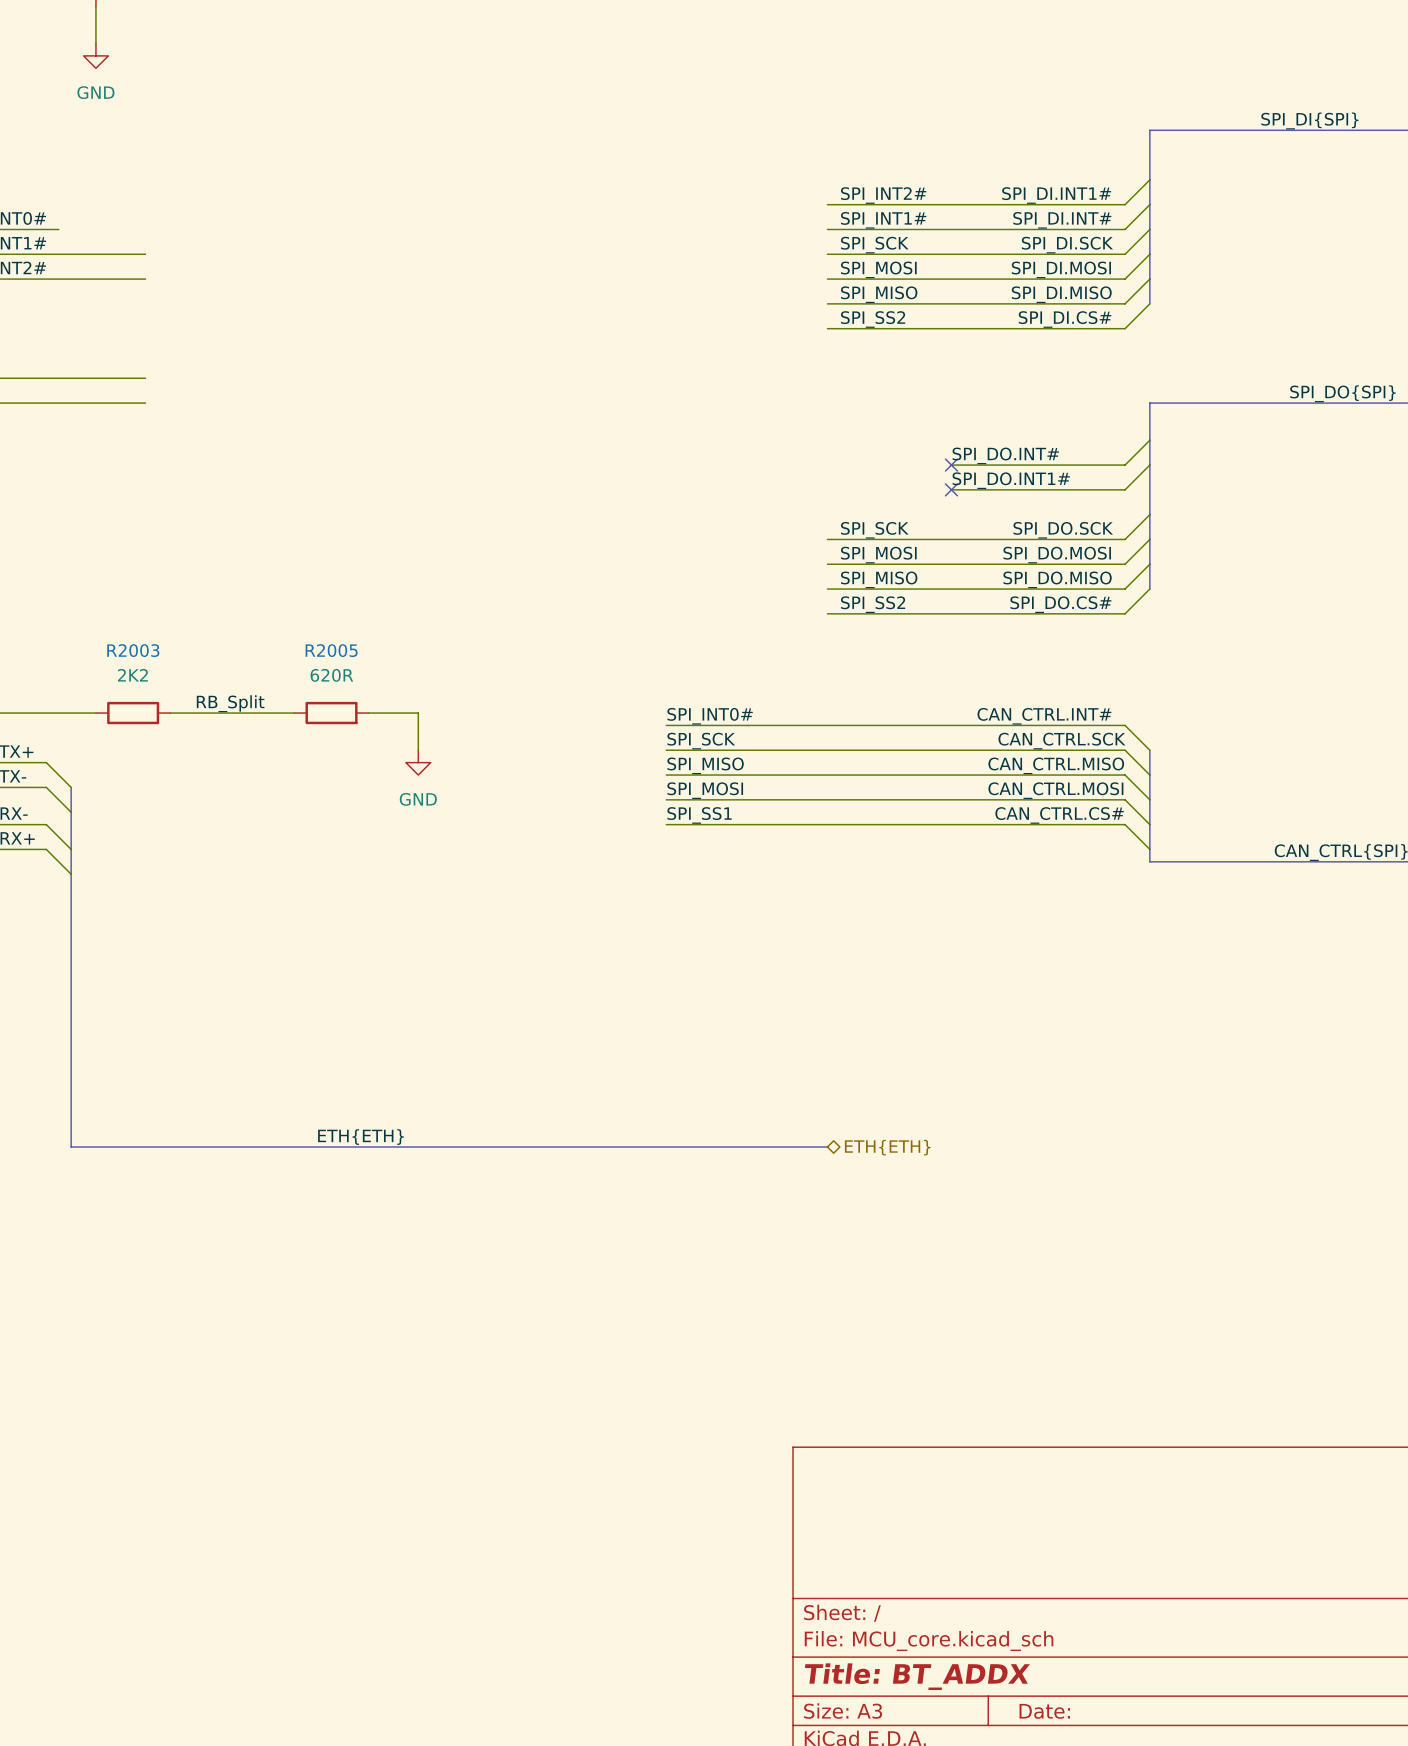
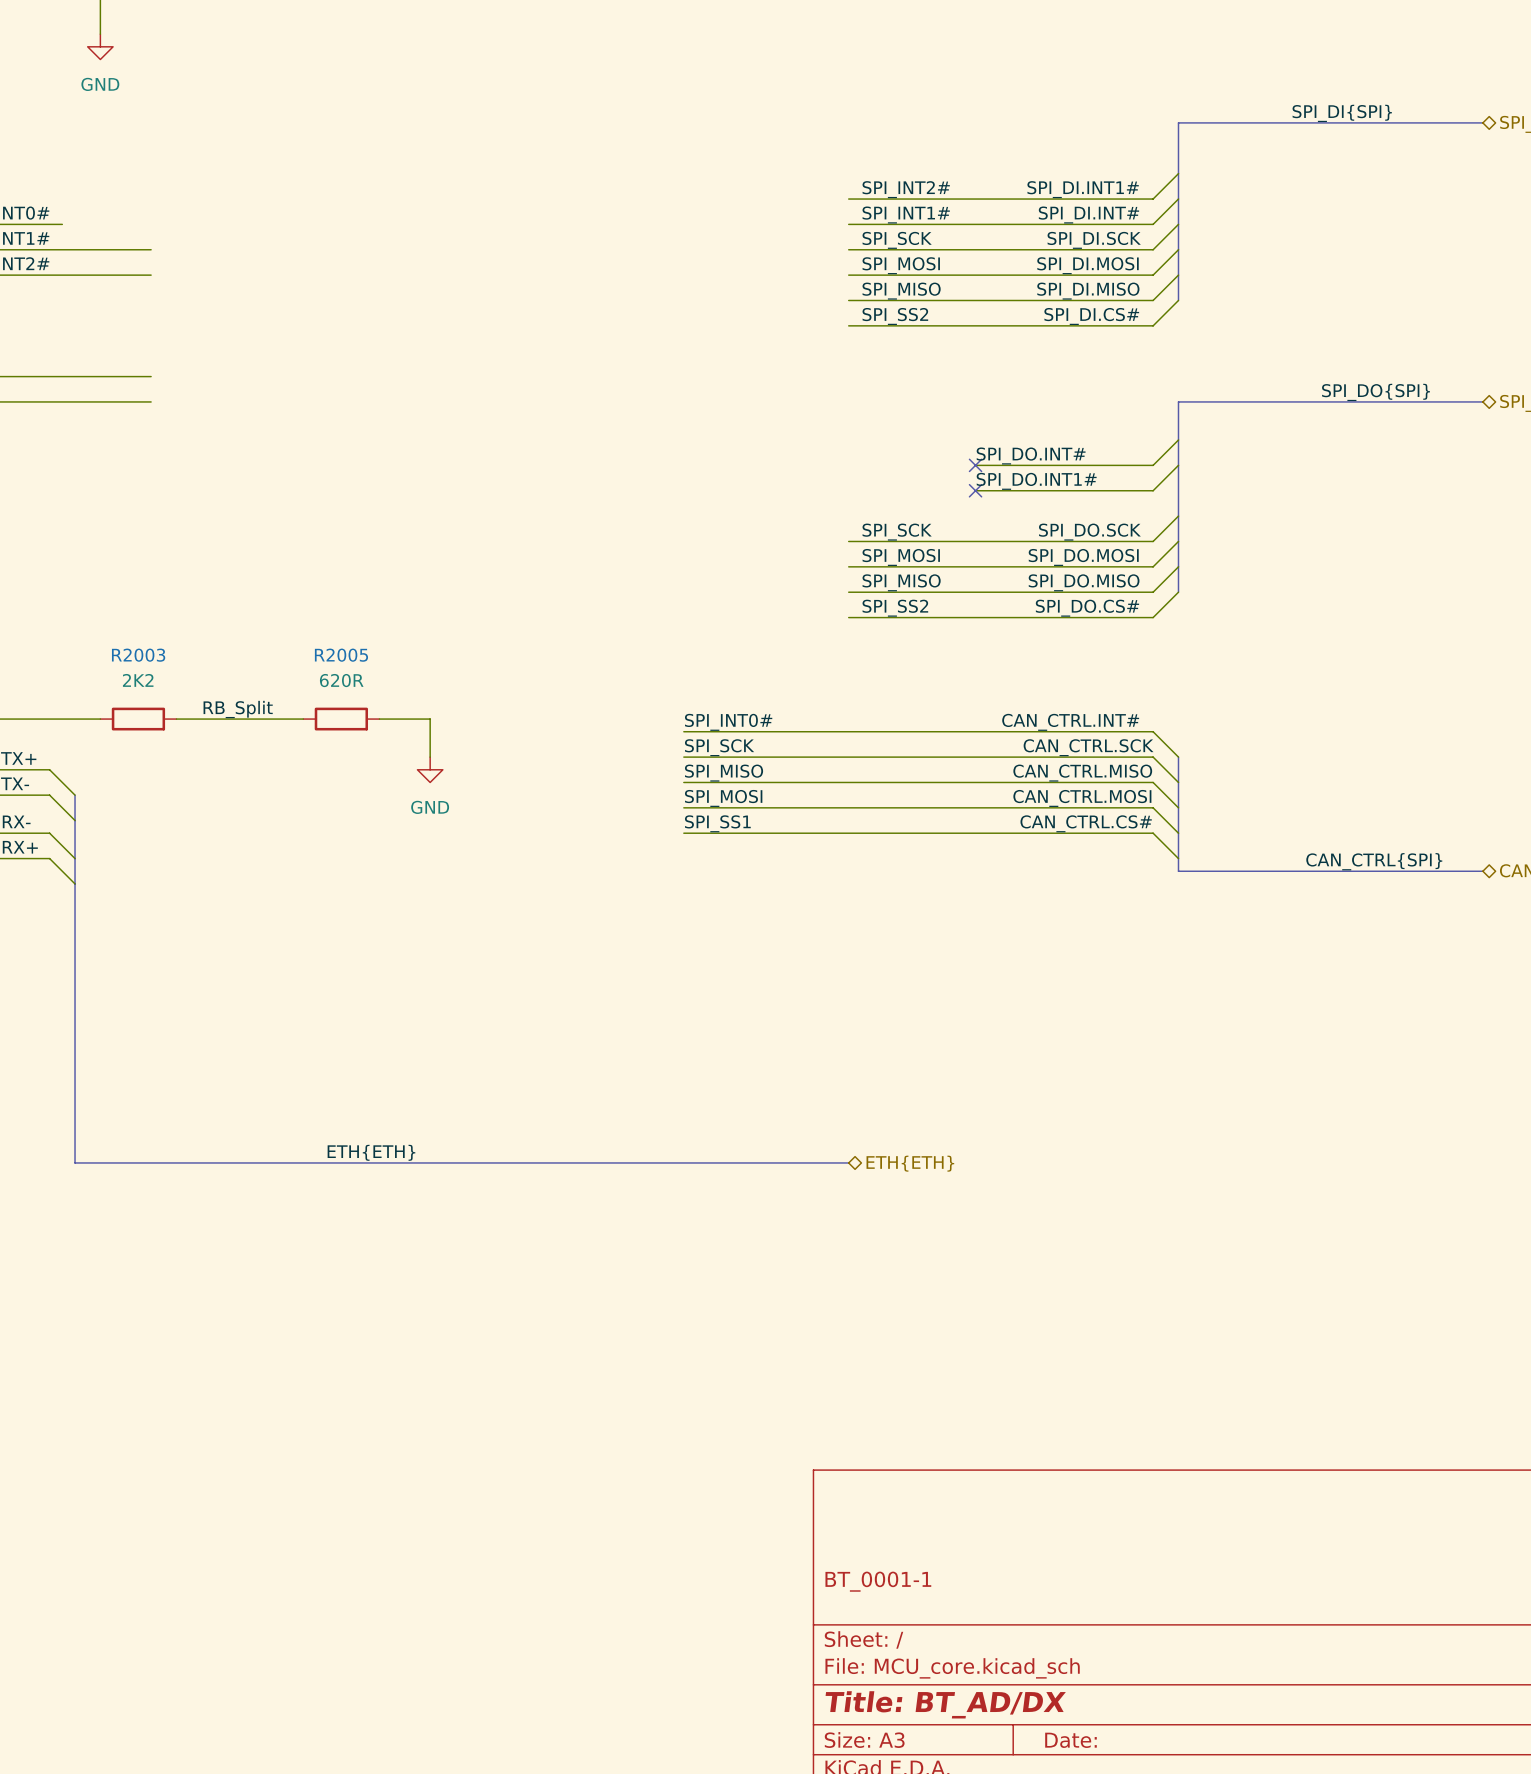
title block: none -> BT_0001-1 (878, 1581)
title block: Title: BT_ADDX (917, 1676) -> Title: BT_AD/DX (945, 1704)

